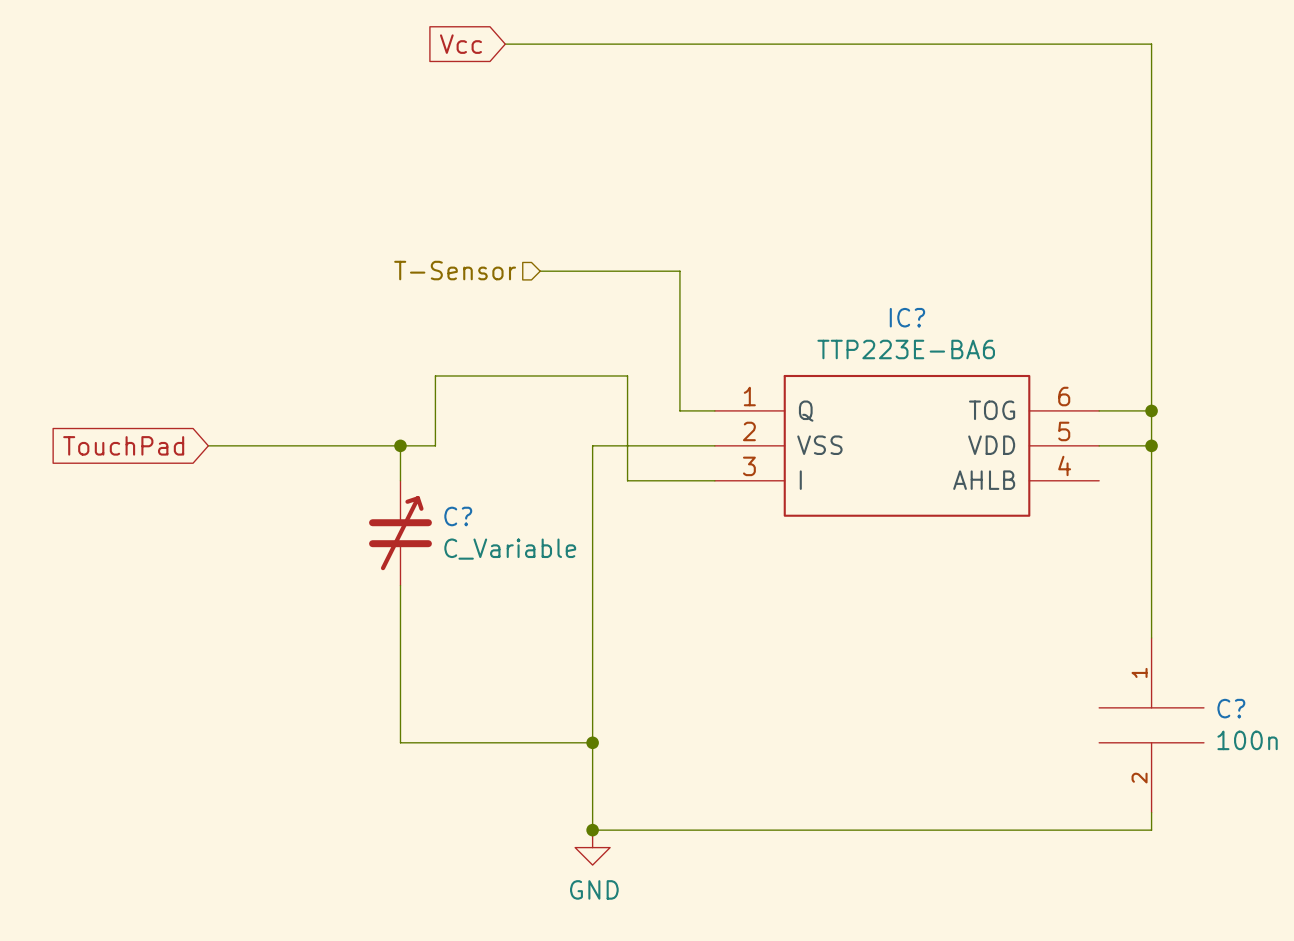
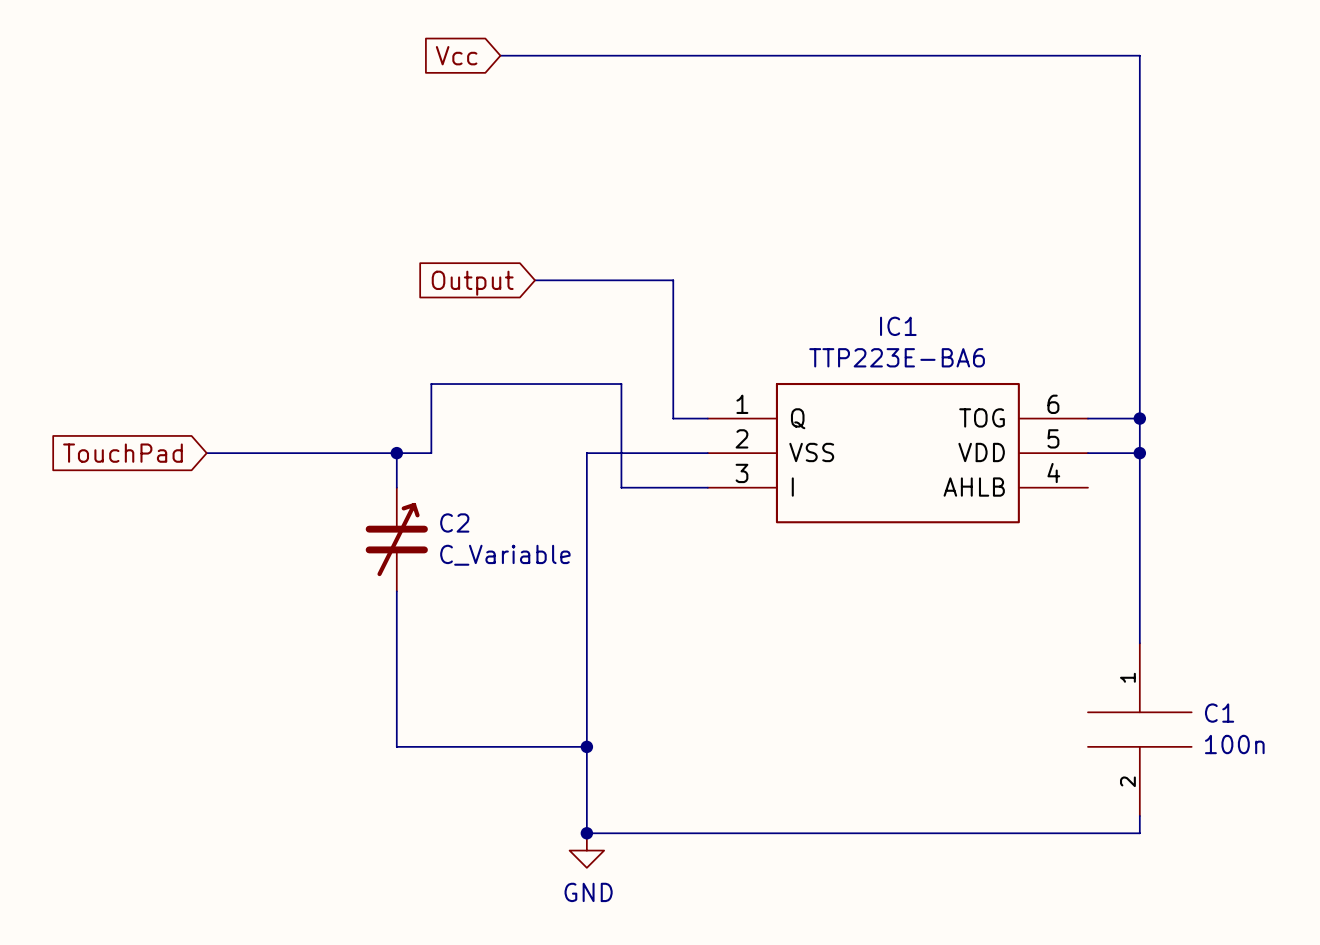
hierarchical label: T-Sensor (455, 270) -> none
global label: none -> Output (472, 283)
IC? name: IC? (907, 317) -> IC1 (898, 326)
C? name: C? (458, 516) -> C2 (454, 522)
C? name: C? (1231, 708) -> C1 (1219, 713)

